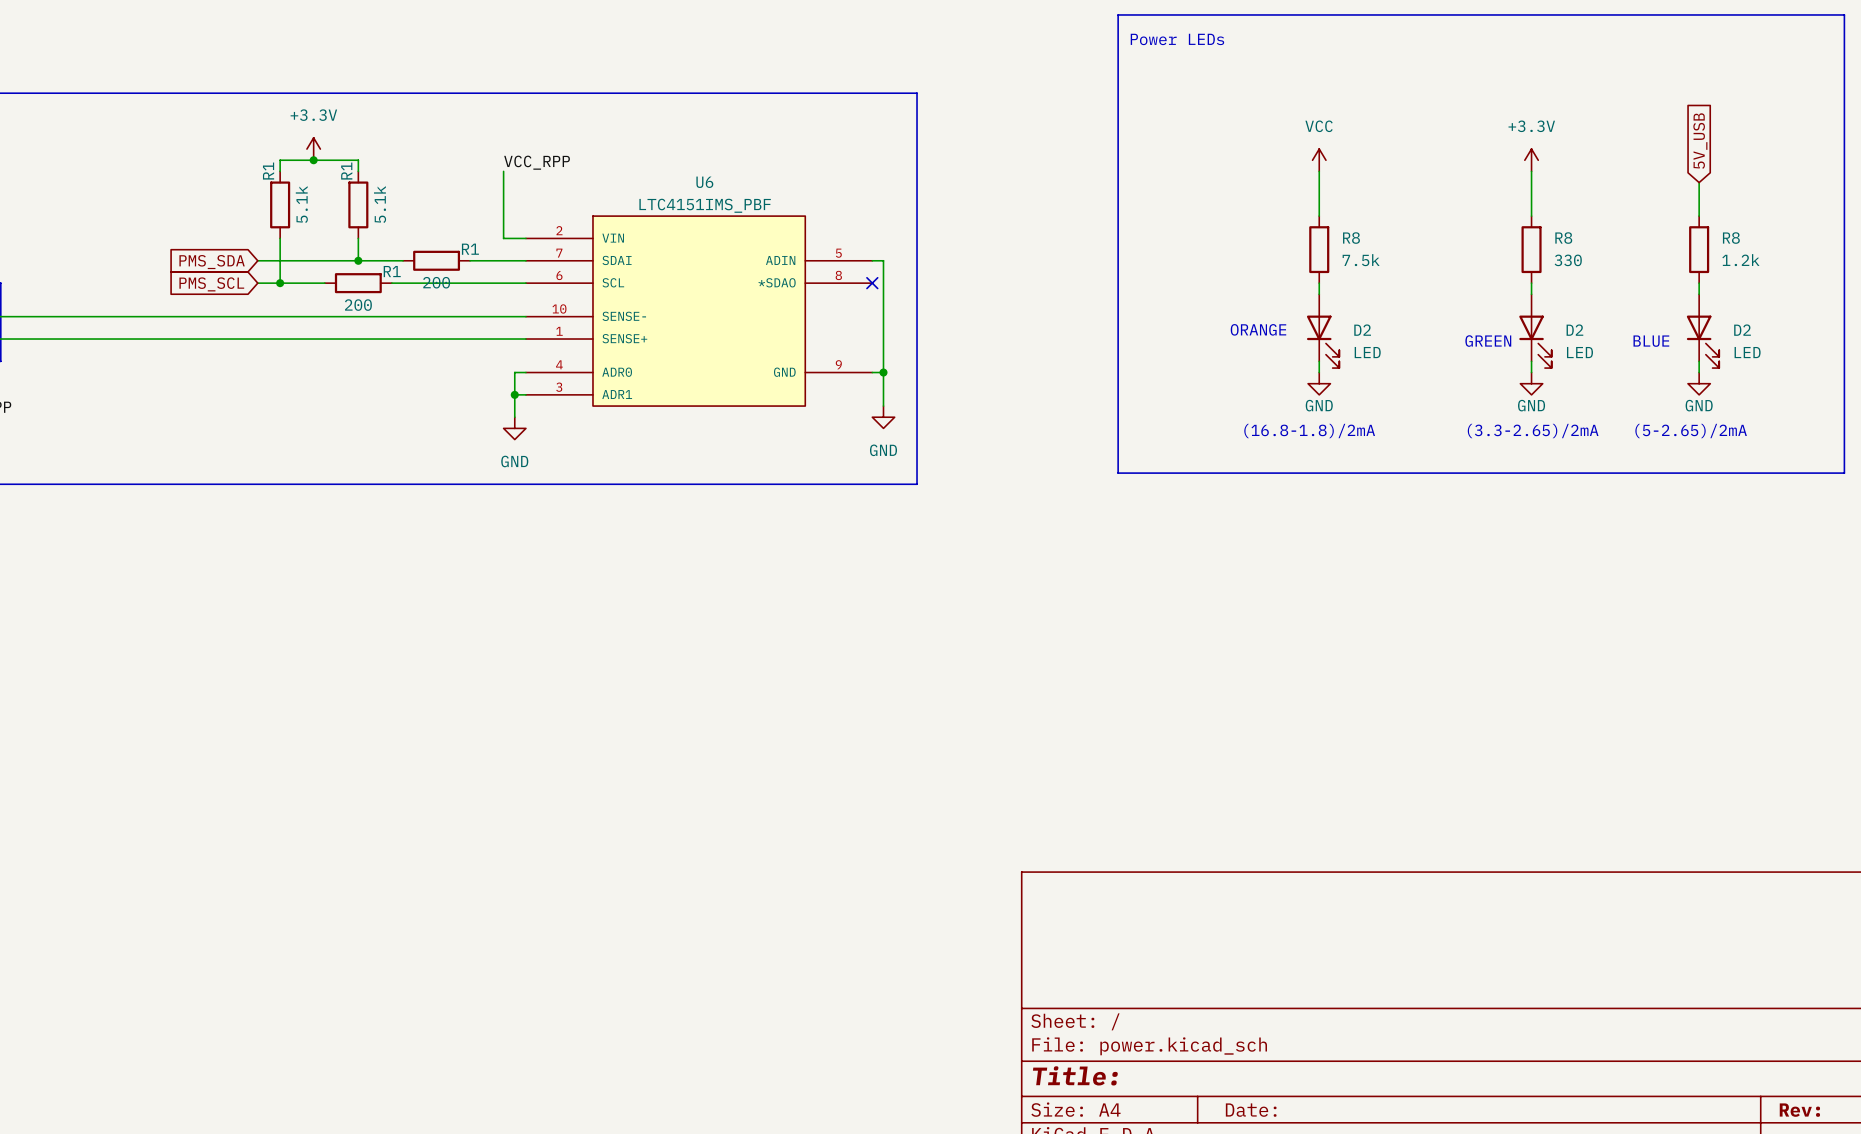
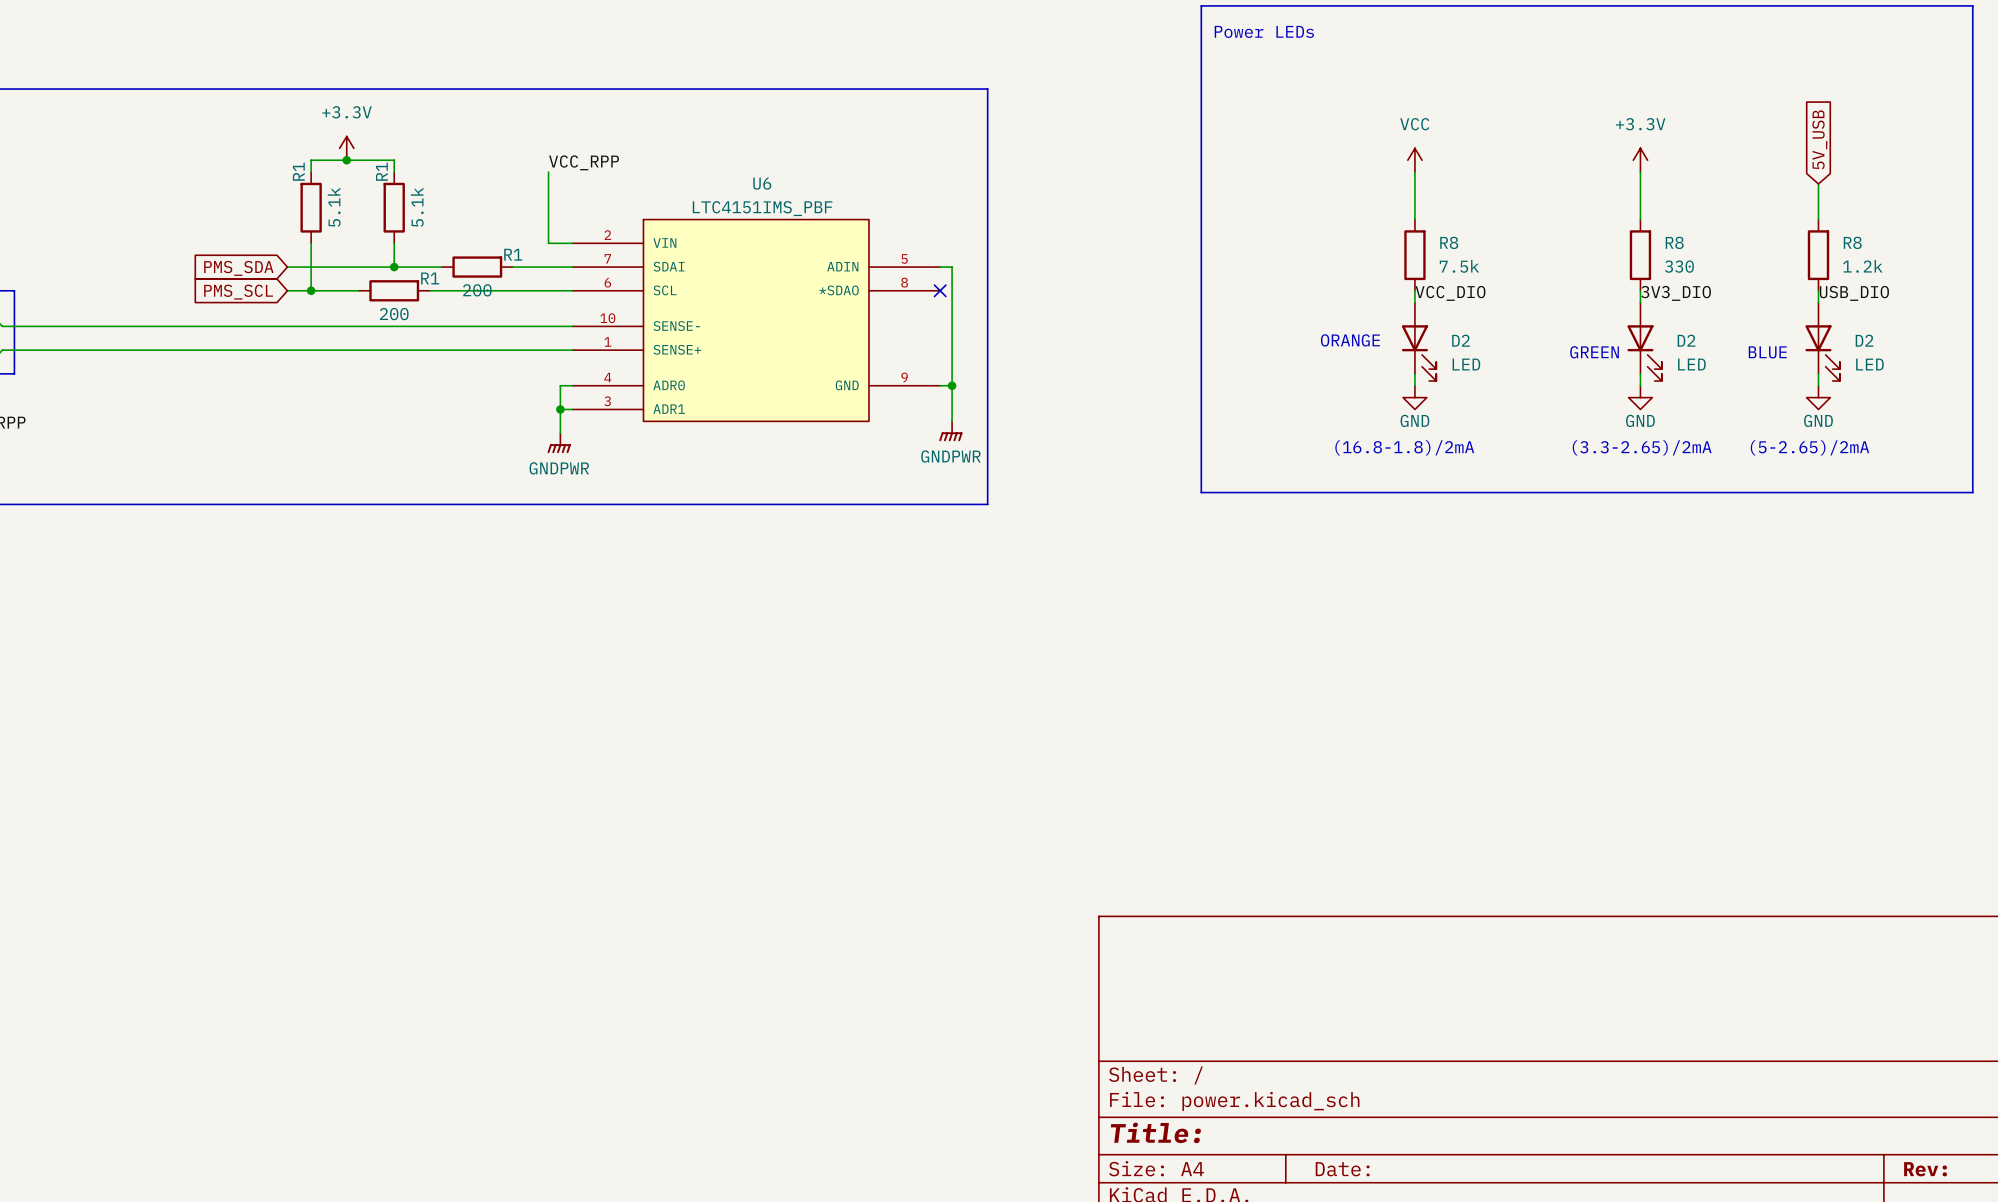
label: none -> VCC_DIO (1450, 293)
label: none -> 3V3_DIO (1676, 293)
label: none -> USB_DIO (1854, 293)
power symbol: GND (883, 417) -> GNDPWR (950, 431)
power symbol: GND (514, 428) -> GNDPWR (559, 443)

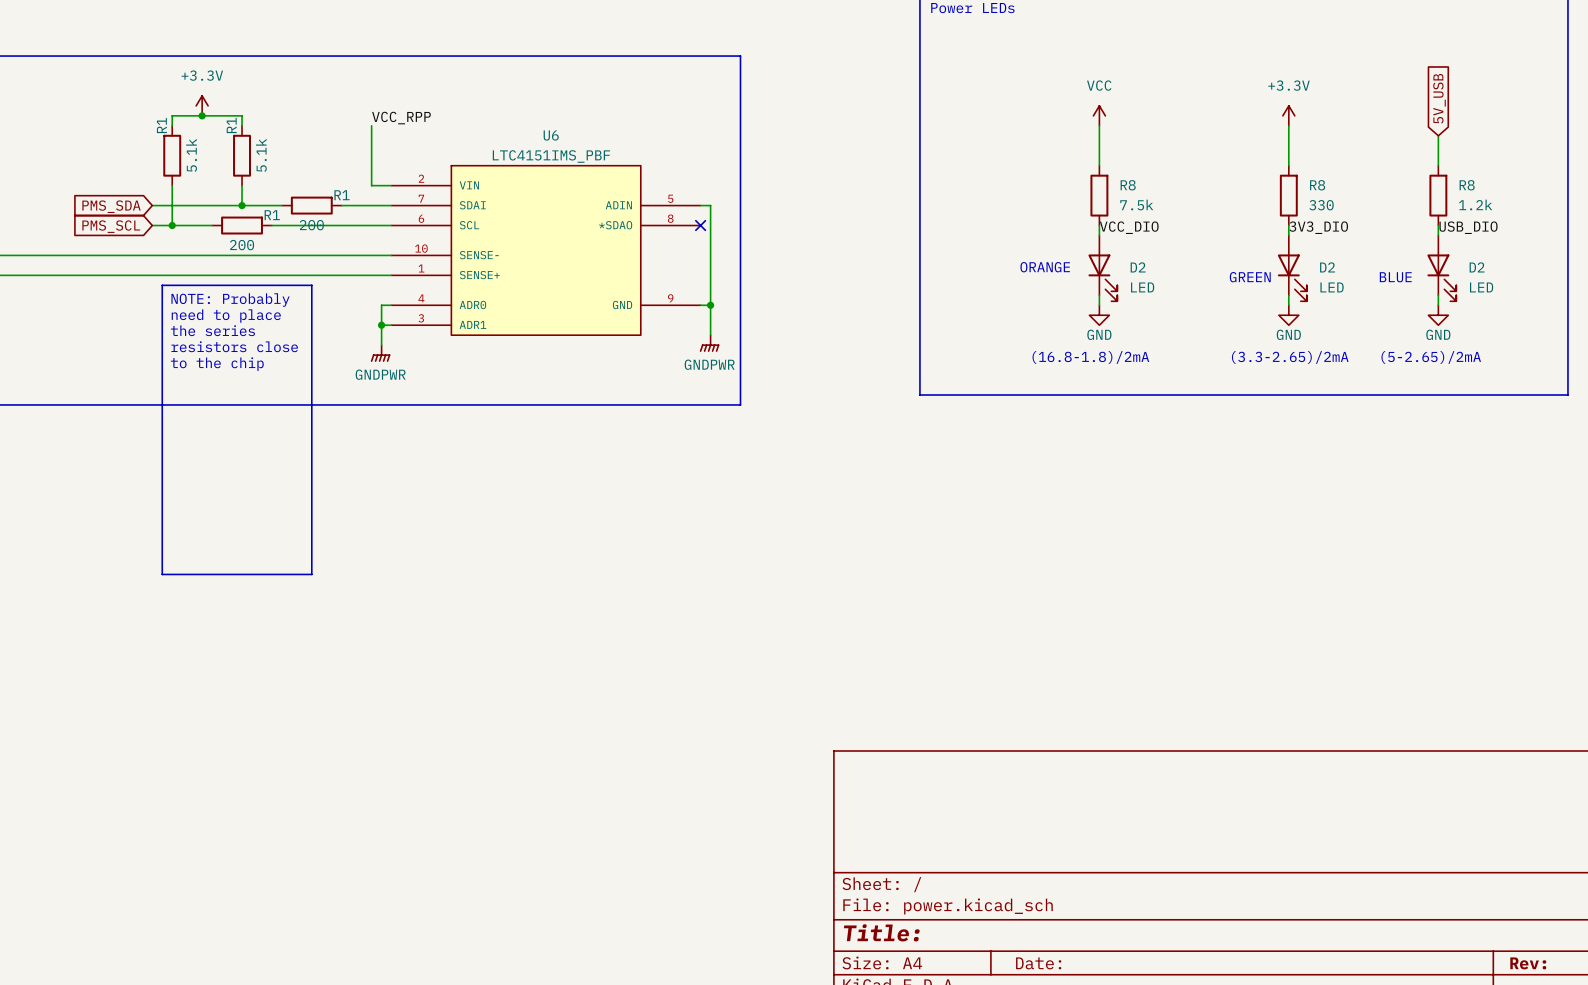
line: none -> (162, 285) (311, 285) (311, 574) (162, 574) (162, 285)
text: none -> NOTE: Probably (230, 300)
text: none -> need to place (226, 316)
text: none -> the series (212, 330)
text: none -> resistors close (234, 346)
text: none -> to the chip (217, 364)

